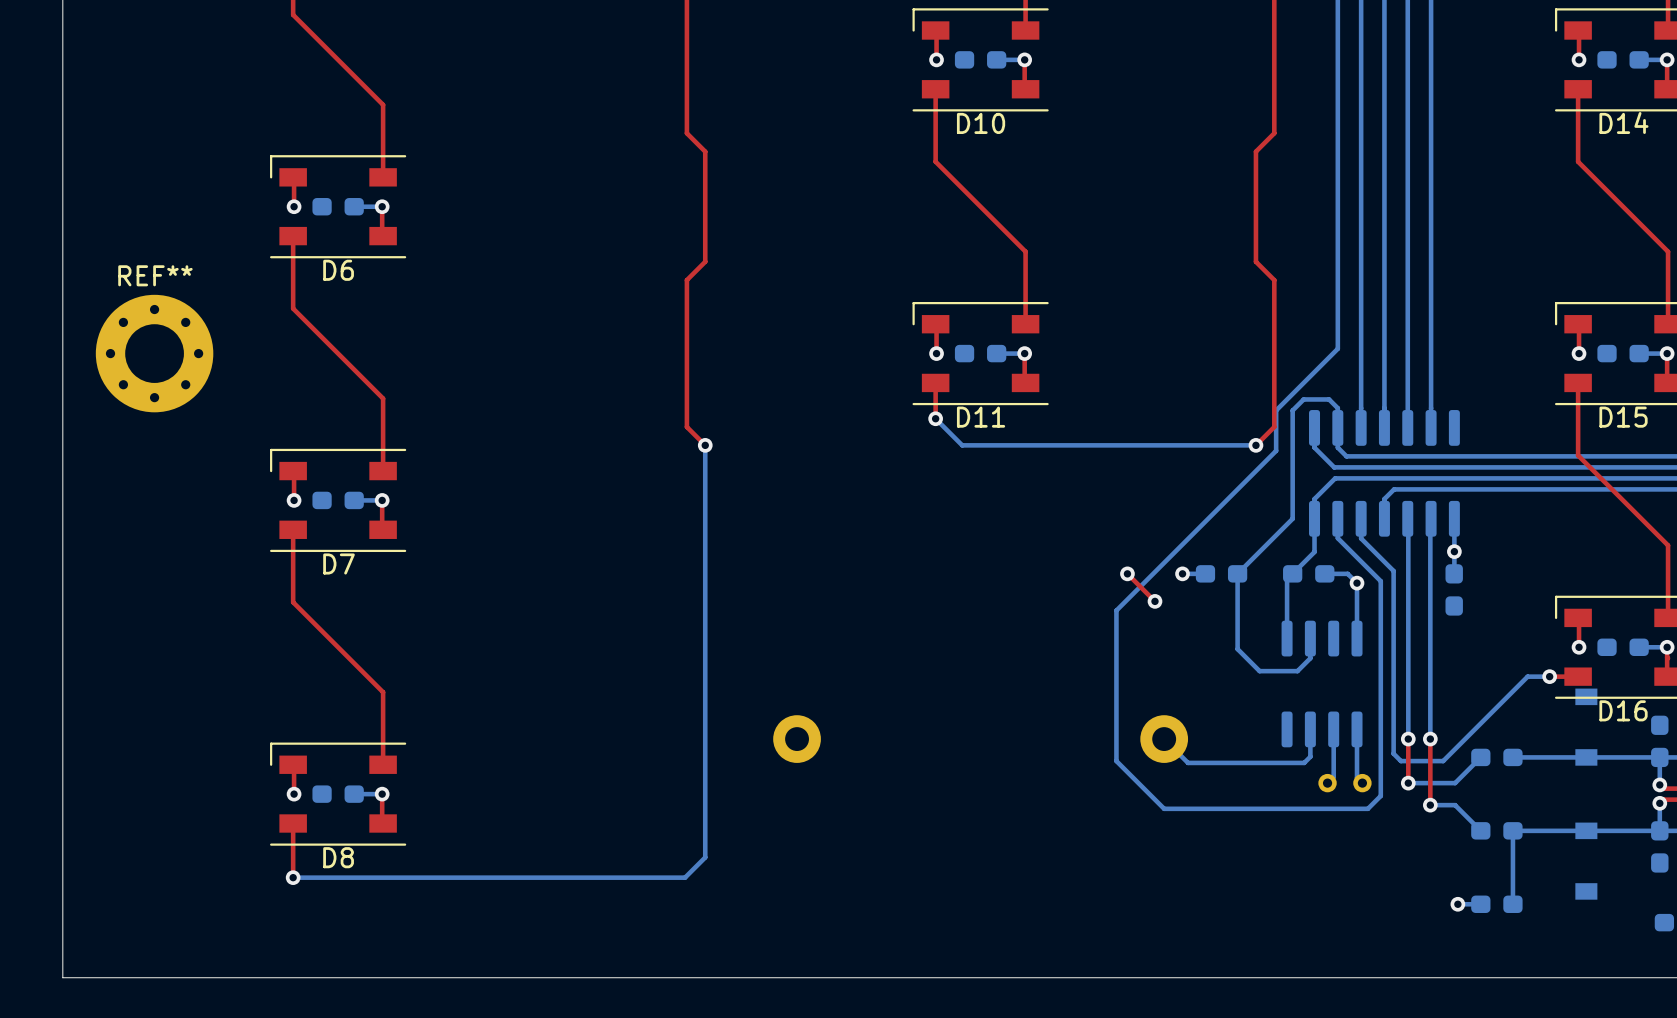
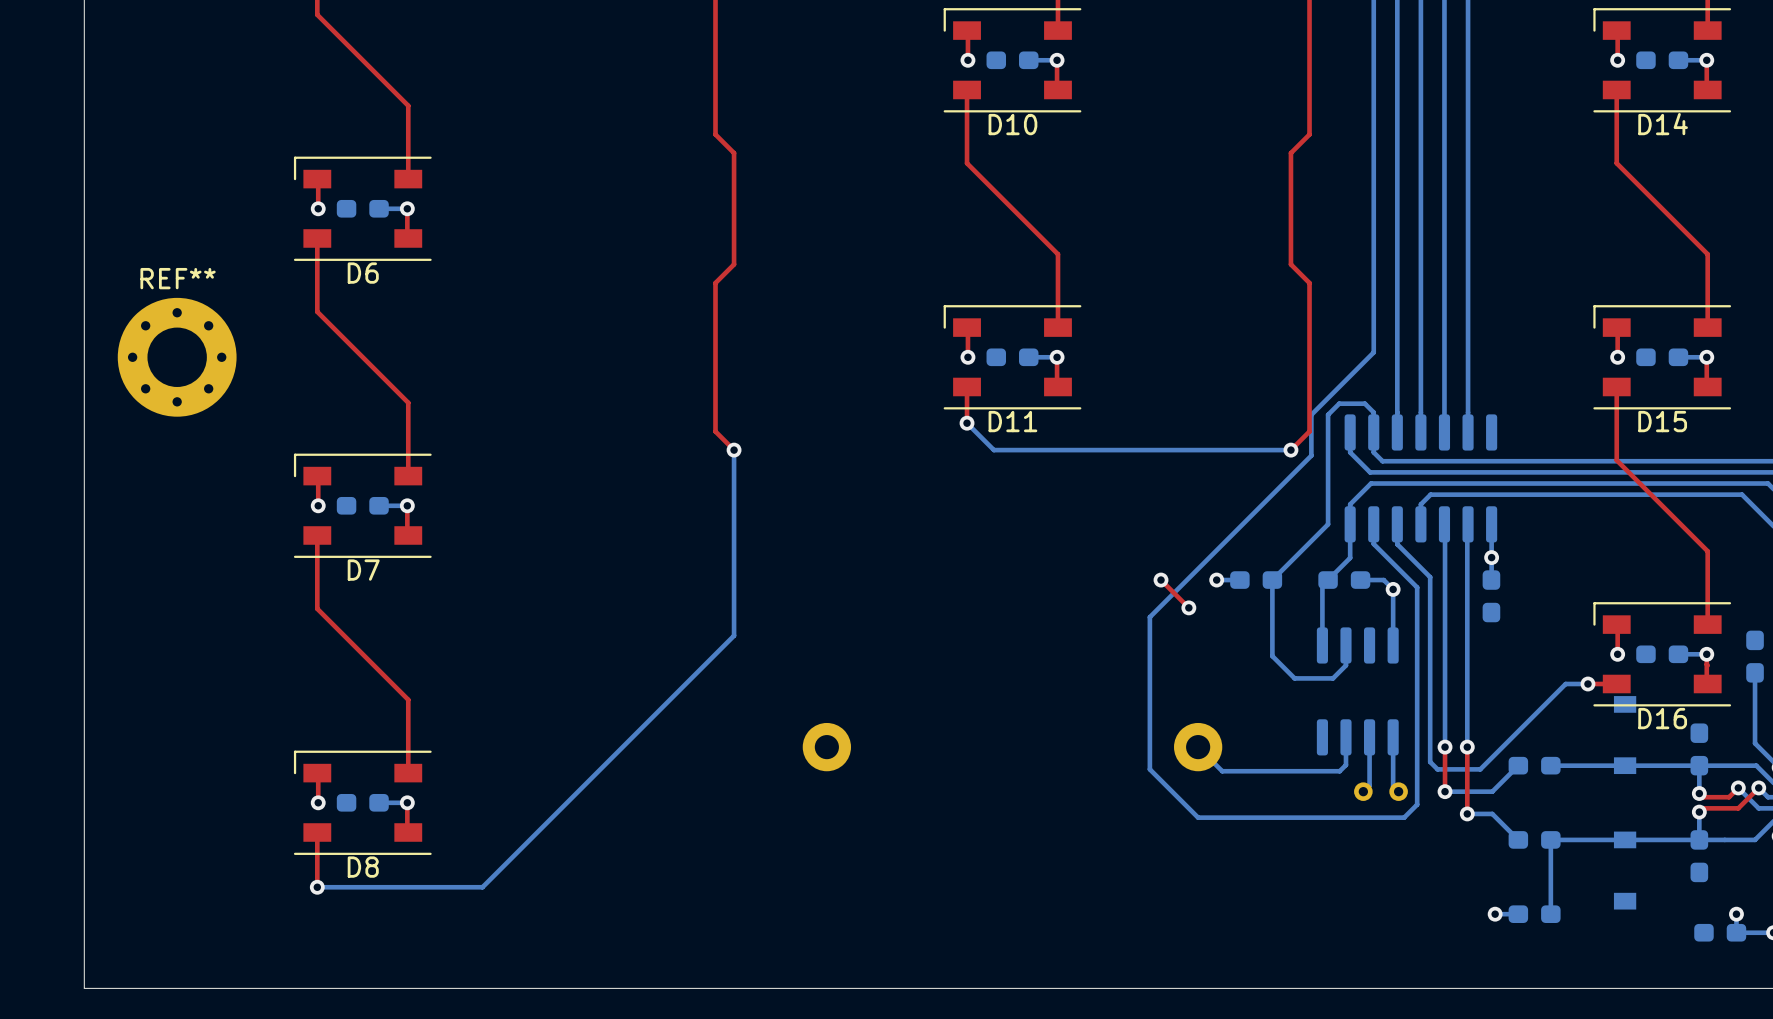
bottom track: (705, 628) (705, 857) (685, 877) (456, 877) -> (734, 635) (482, 887)

